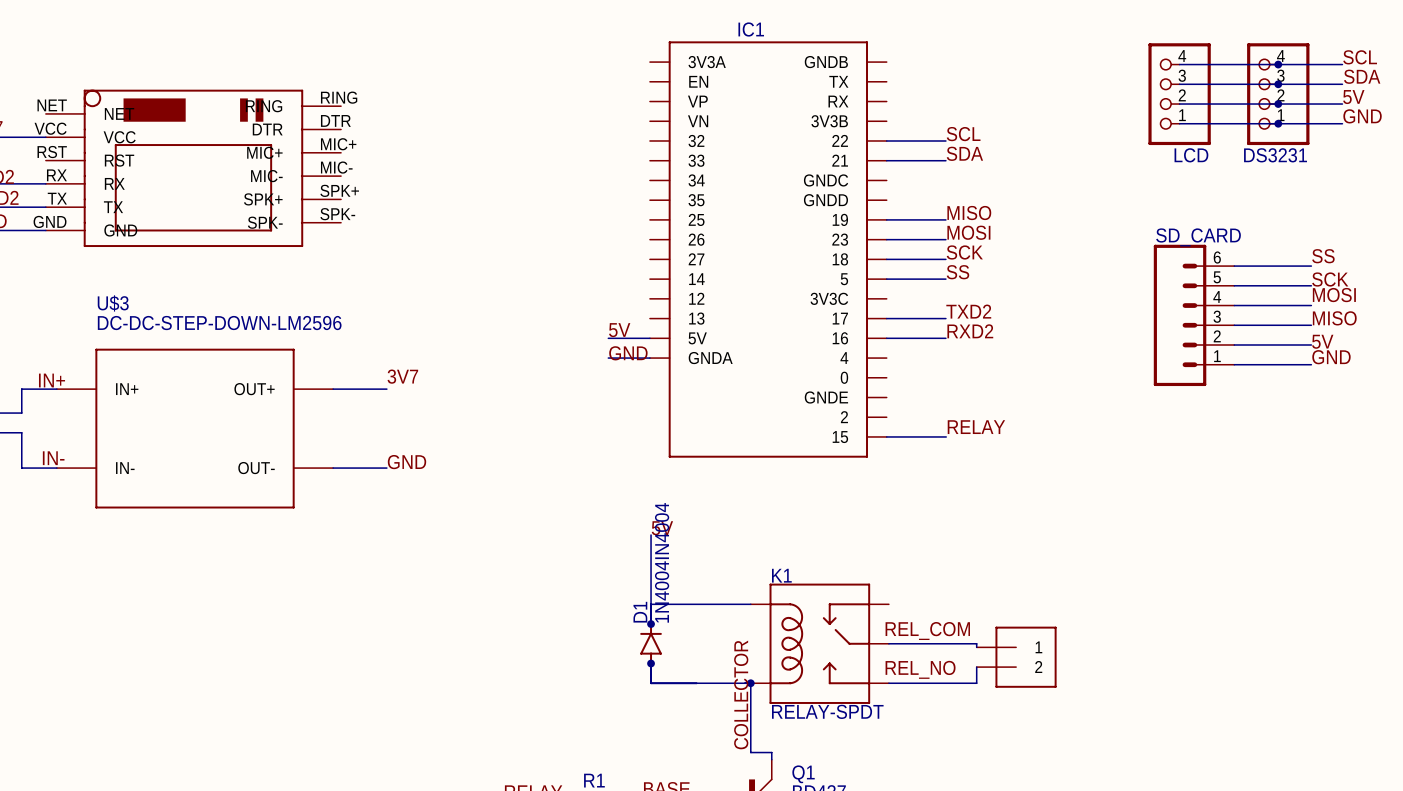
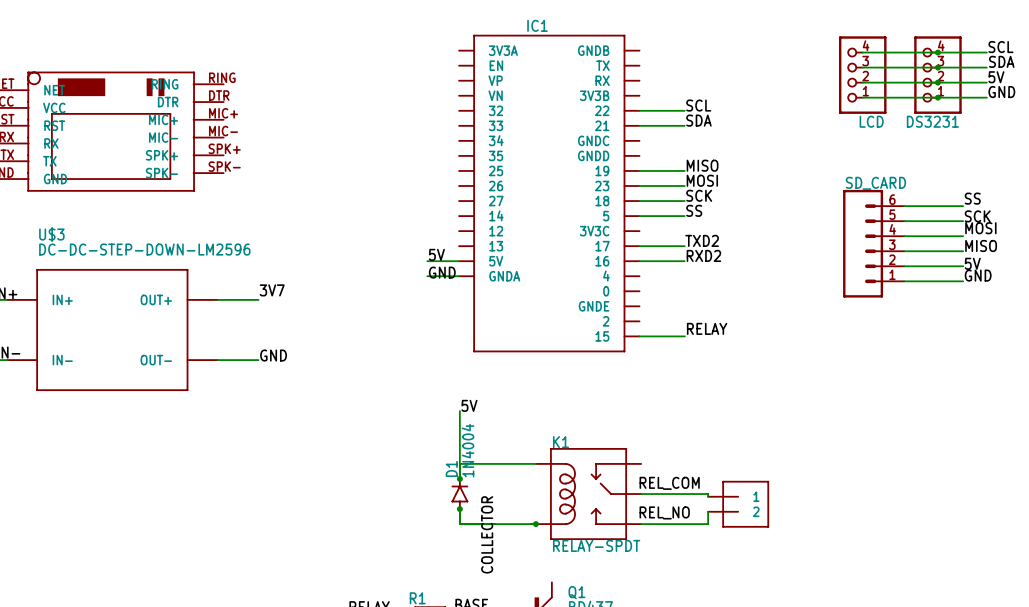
D1 value: 1N4004IN4004 (662, 562) -> 1N4004 (468, 450)
wire: (750, 683) (750, 752) (771, 752) (771, 759) -> none
label position: COLLECTOR (741, 694) -> COLLECTOR (487, 534)

